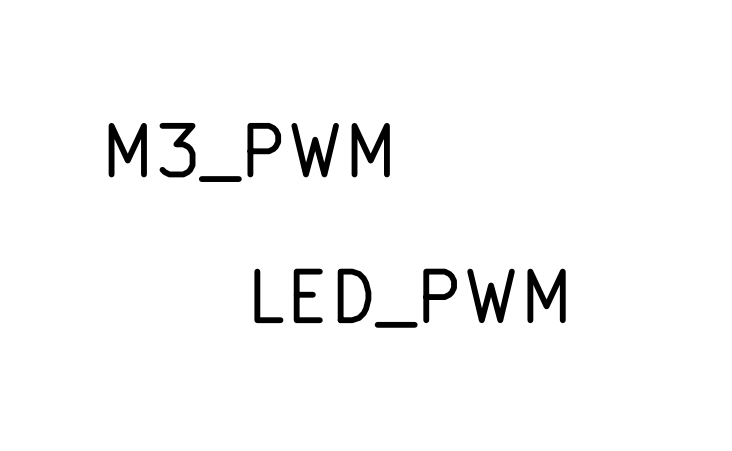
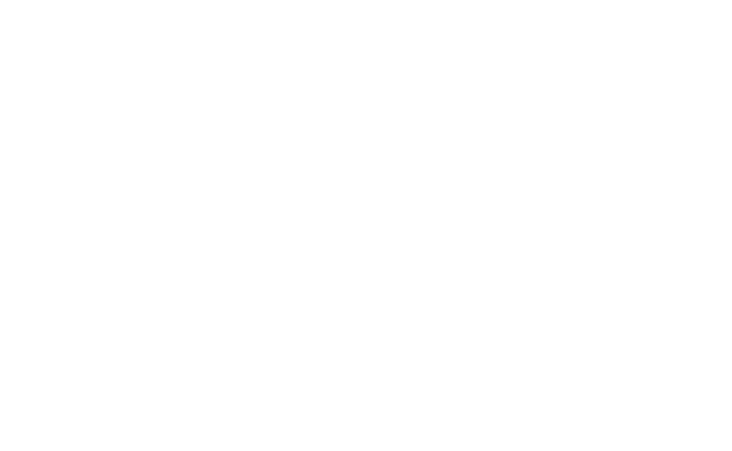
label: M3_PWM (249, 152) -> none
label: LED_PWM (410, 298) -> none

